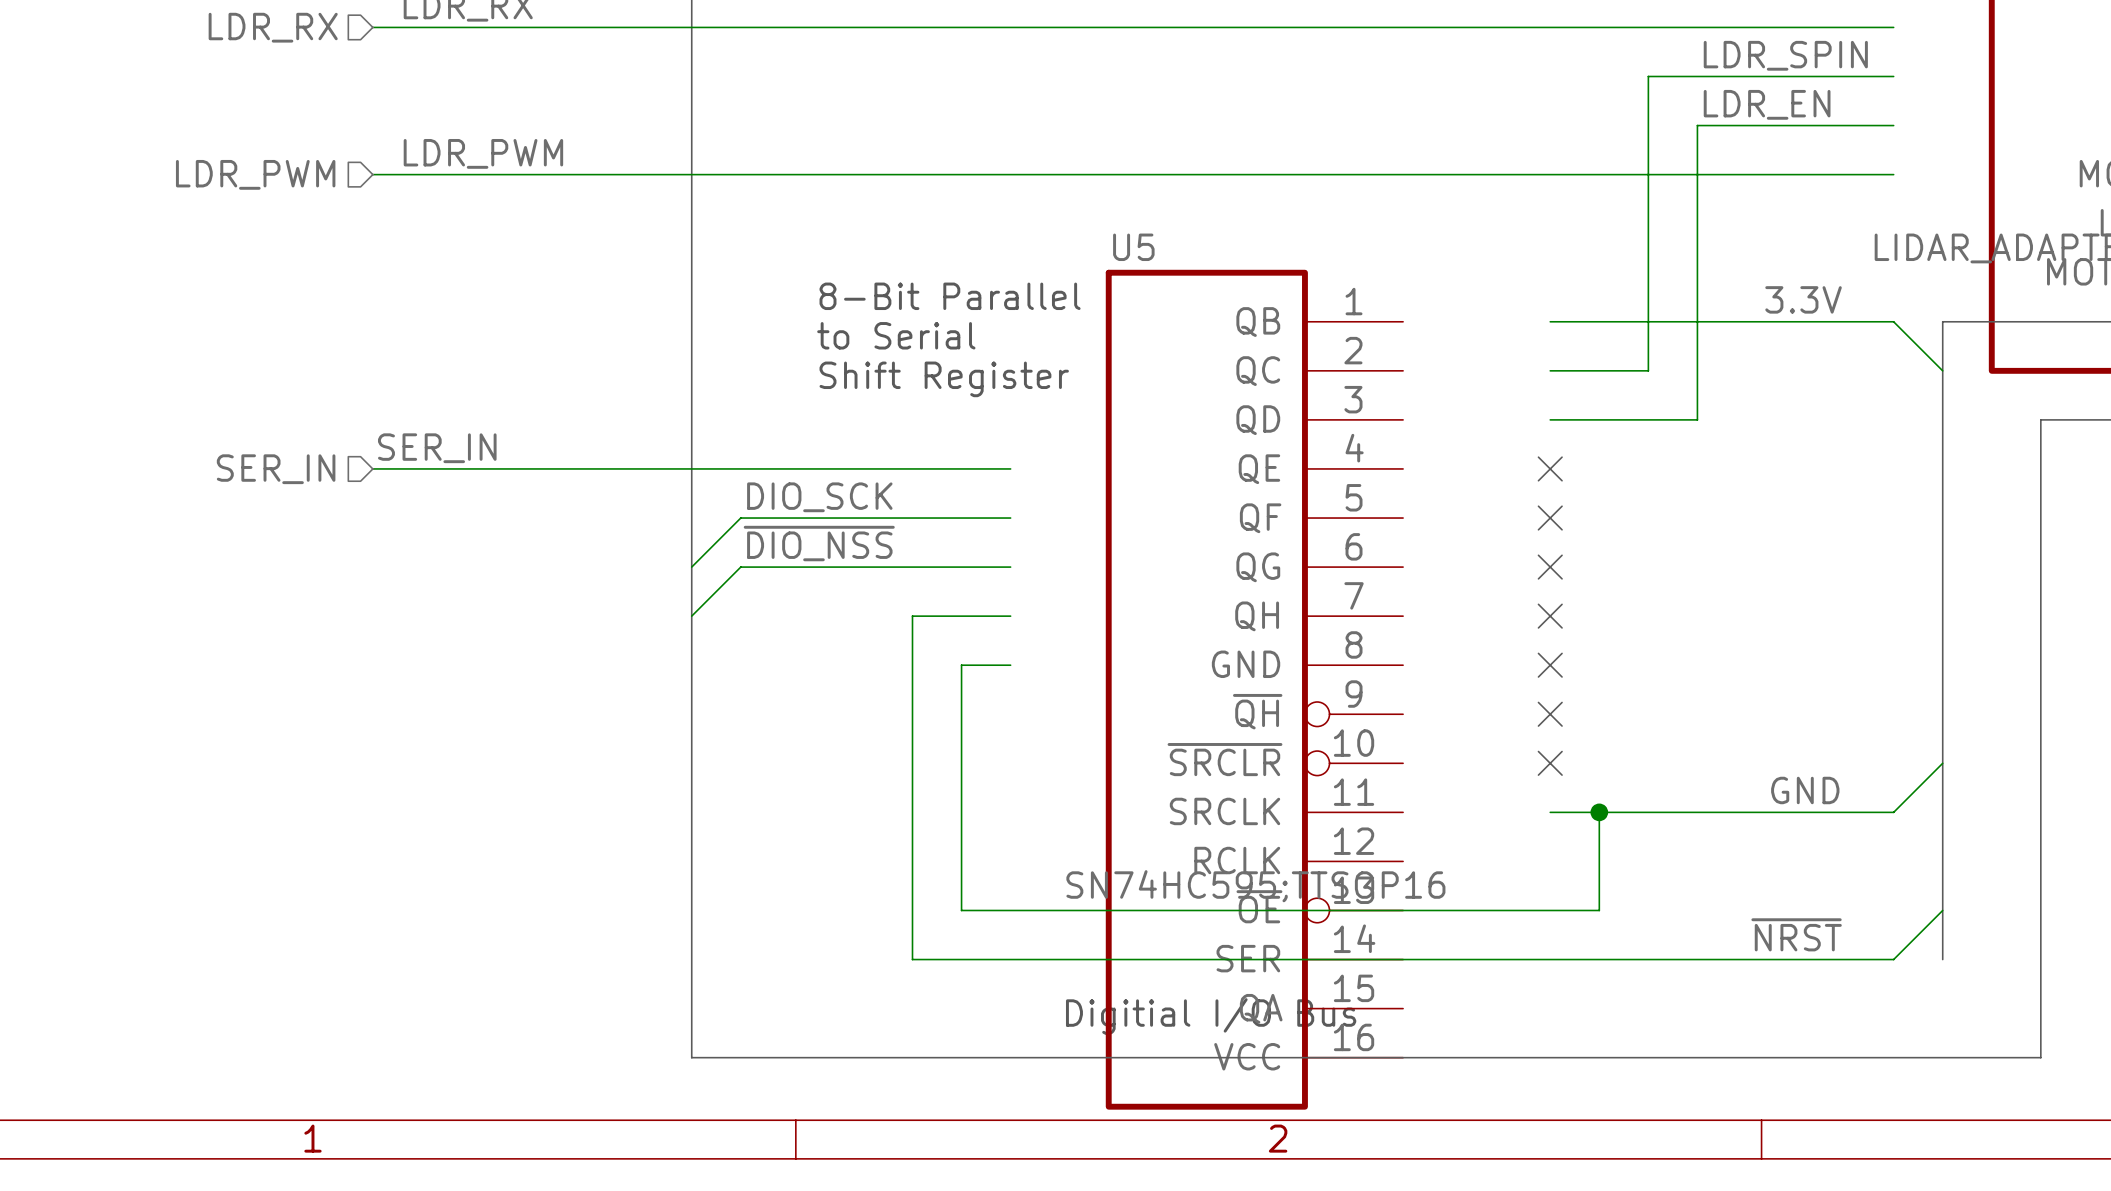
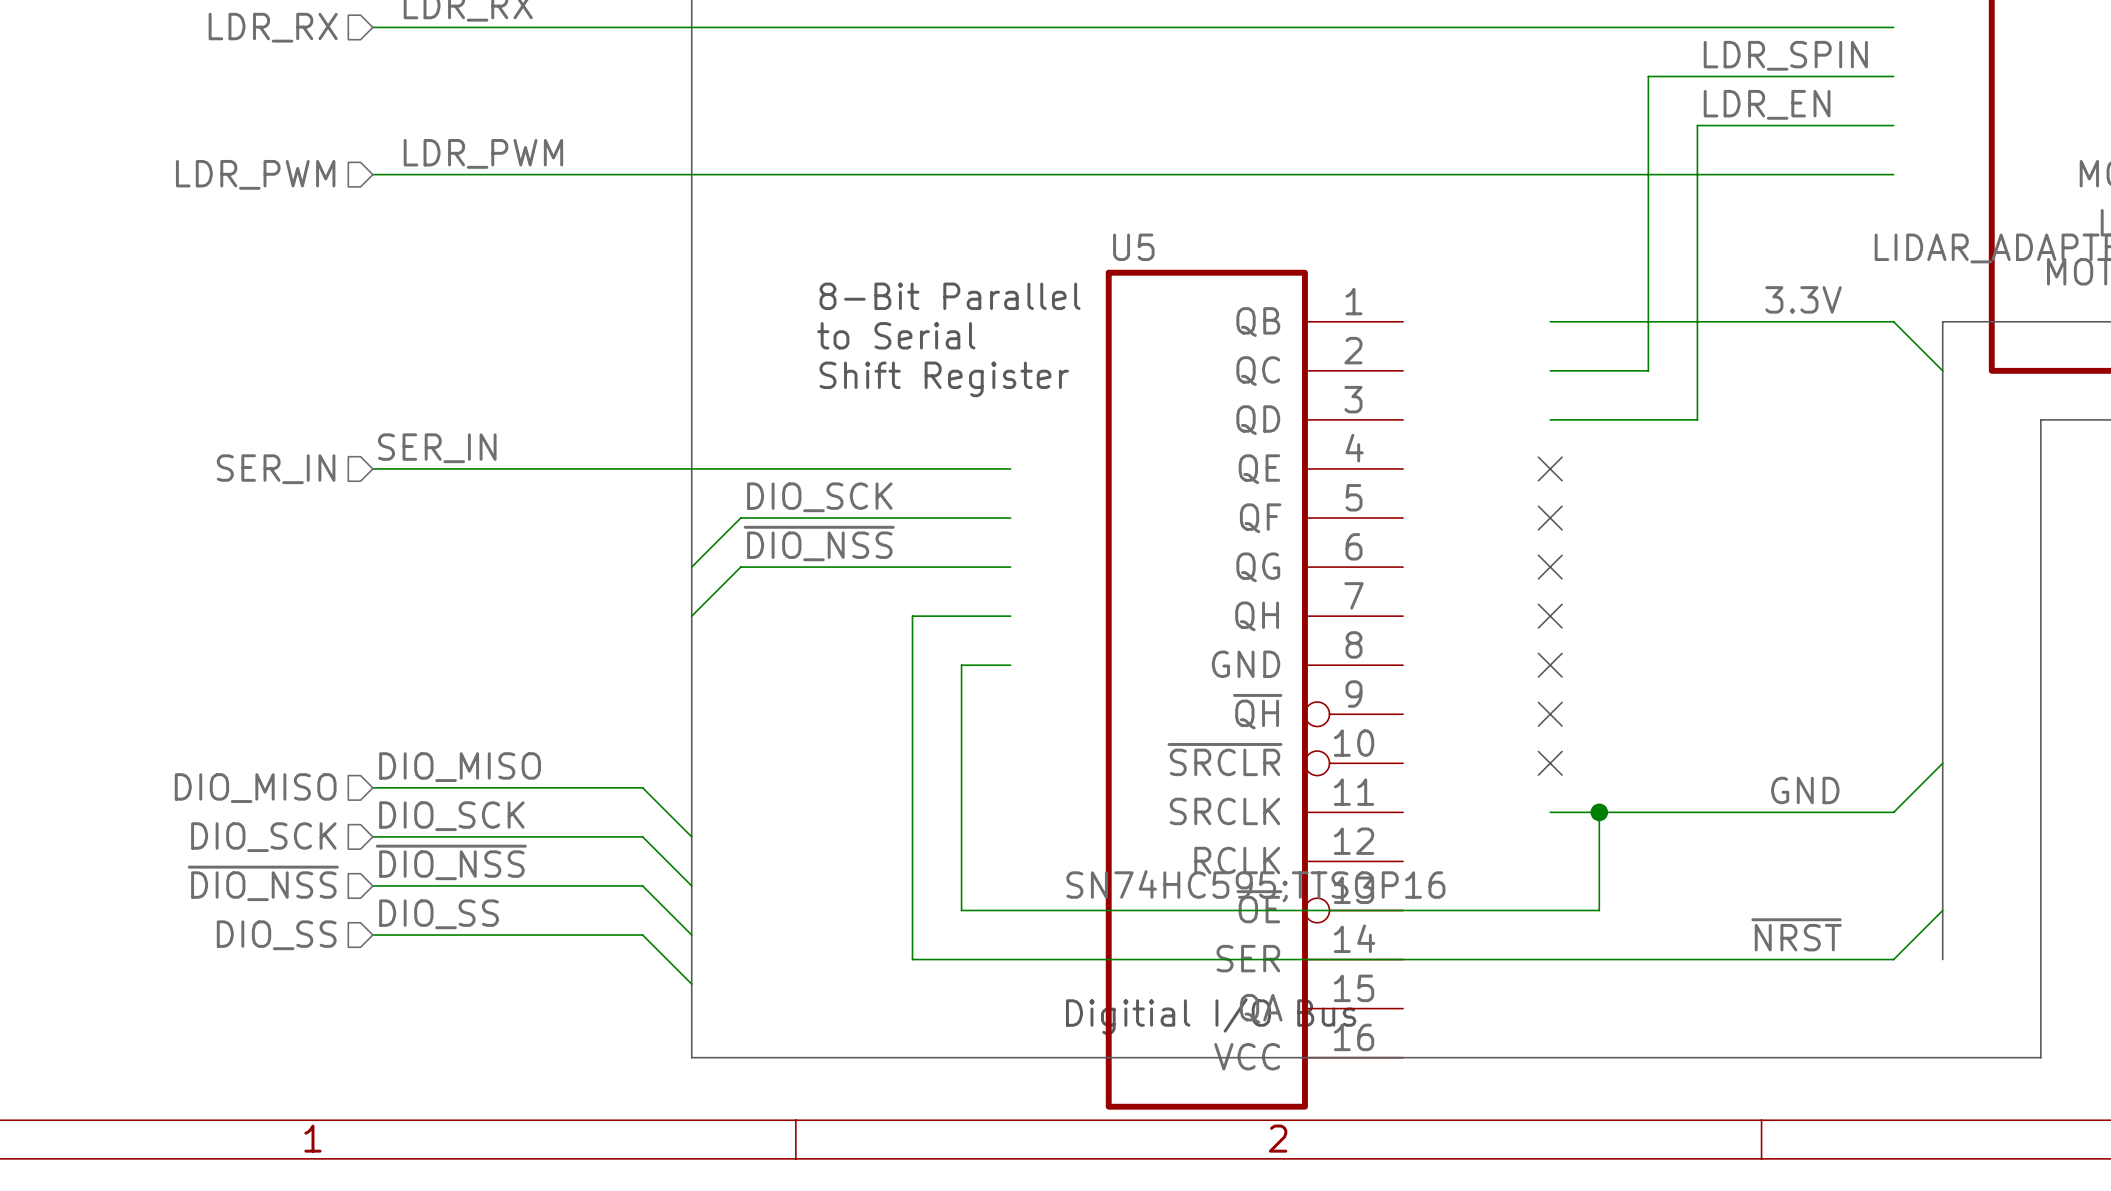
label: none -> DIO_MISO (460, 767)
wire: none -> (372, 787) (642, 787) (691, 836)
hierarchical label: none -> DIO_MISO (255, 788)
label: none -> DIO_SCK (451, 816)
wire: none -> (372, 836) (642, 836) (691, 885)
hierarchical label: none -> DIO_SCK (263, 837)
label: none -> ~{DIO_NSS} (451, 862)
hierarchical label: none -> ~{DIO_NSS} (263, 883)
wire: none -> (372, 885) (642, 885) (691, 935)
label: none -> DIO_SS (439, 914)
hierarchical label: none -> DIO_SS (276, 935)
wire: none -> (372, 935) (642, 935) (691, 984)

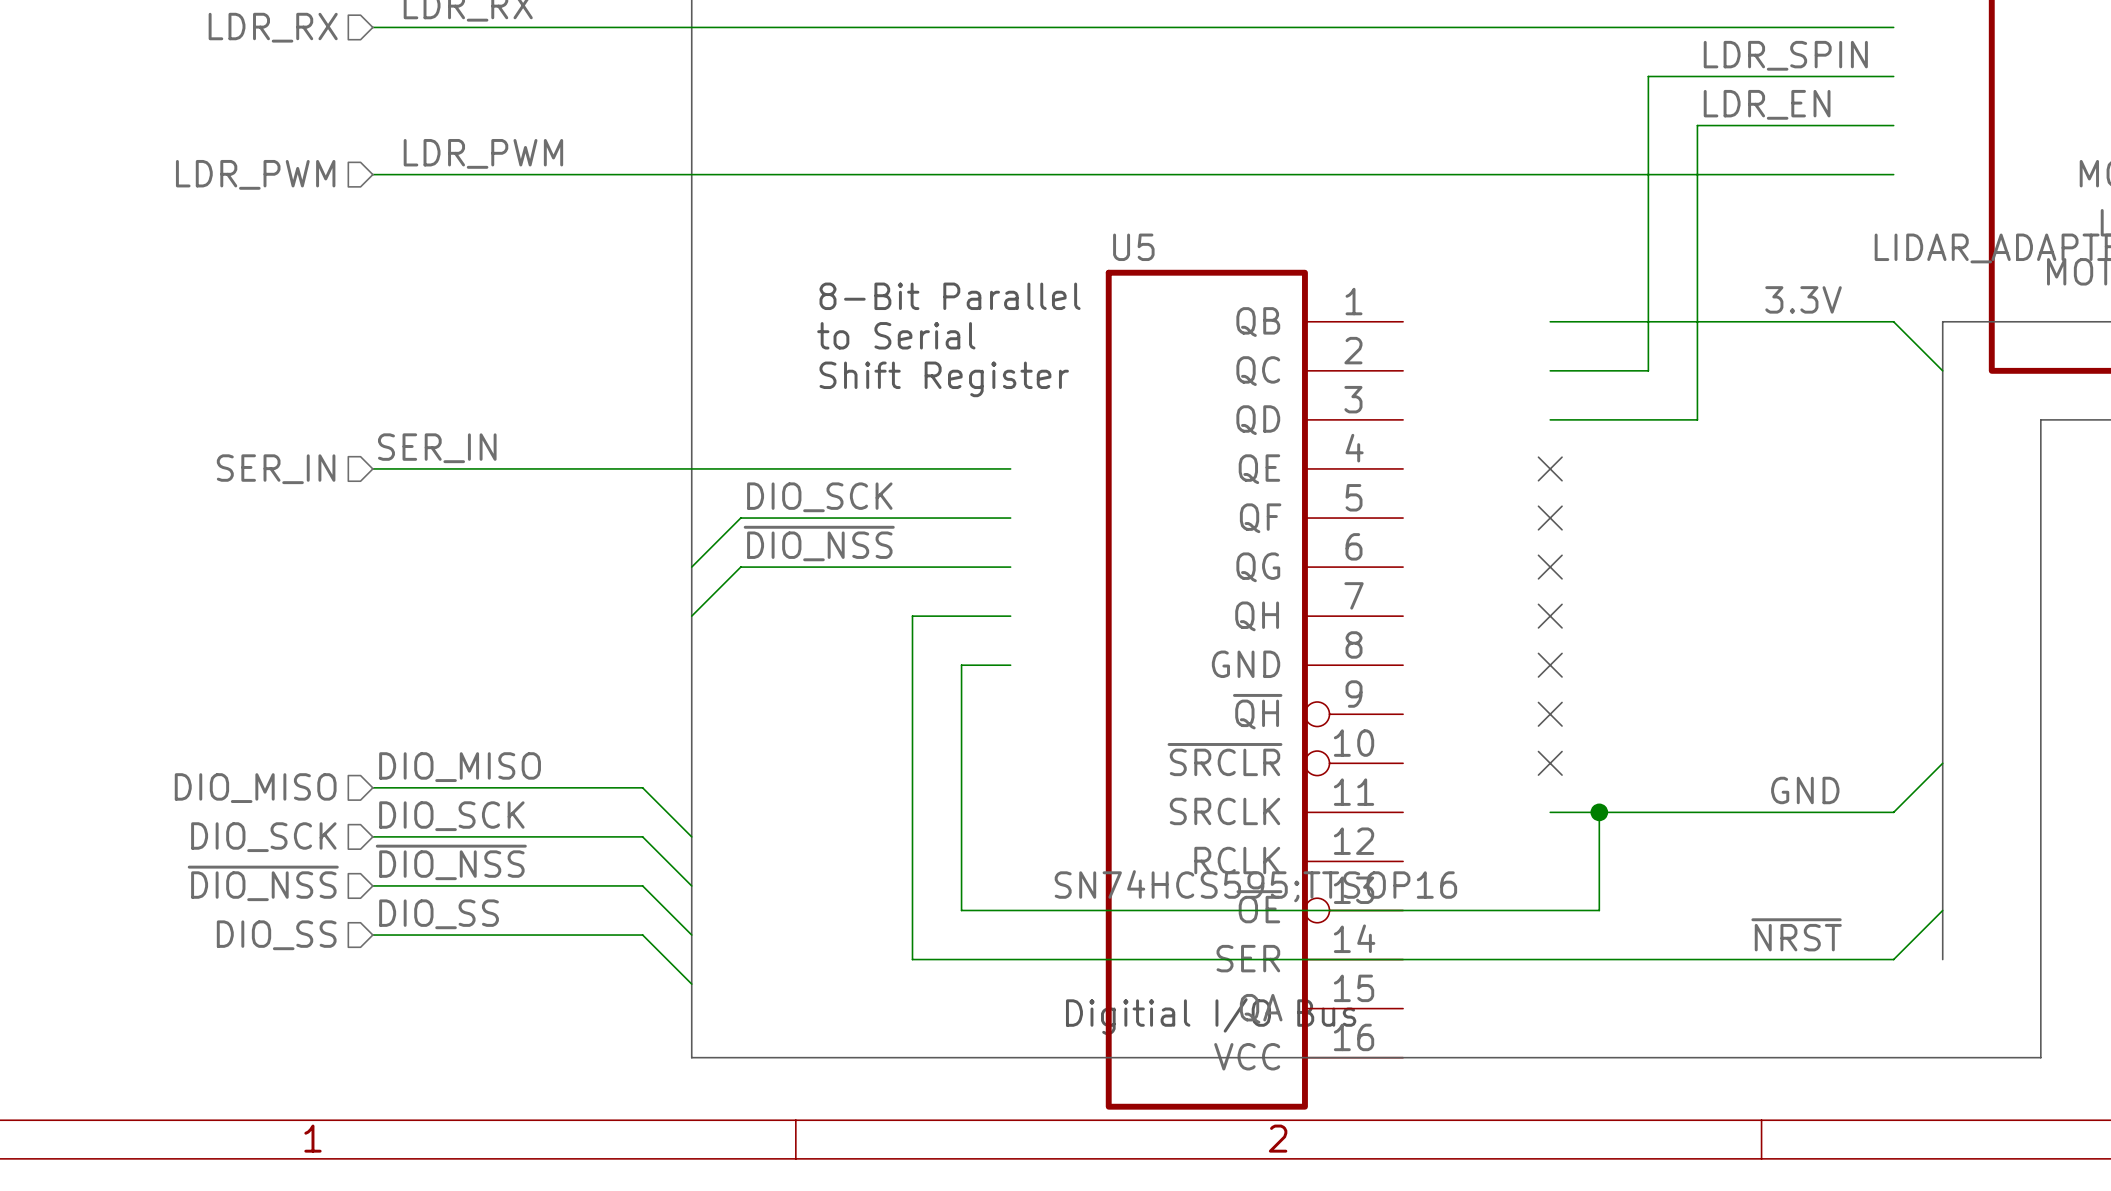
U5 value: SN74HC595;TTSOP16 (1255, 886) -> SN74HCS595;TTSOP16 (1255, 886)

